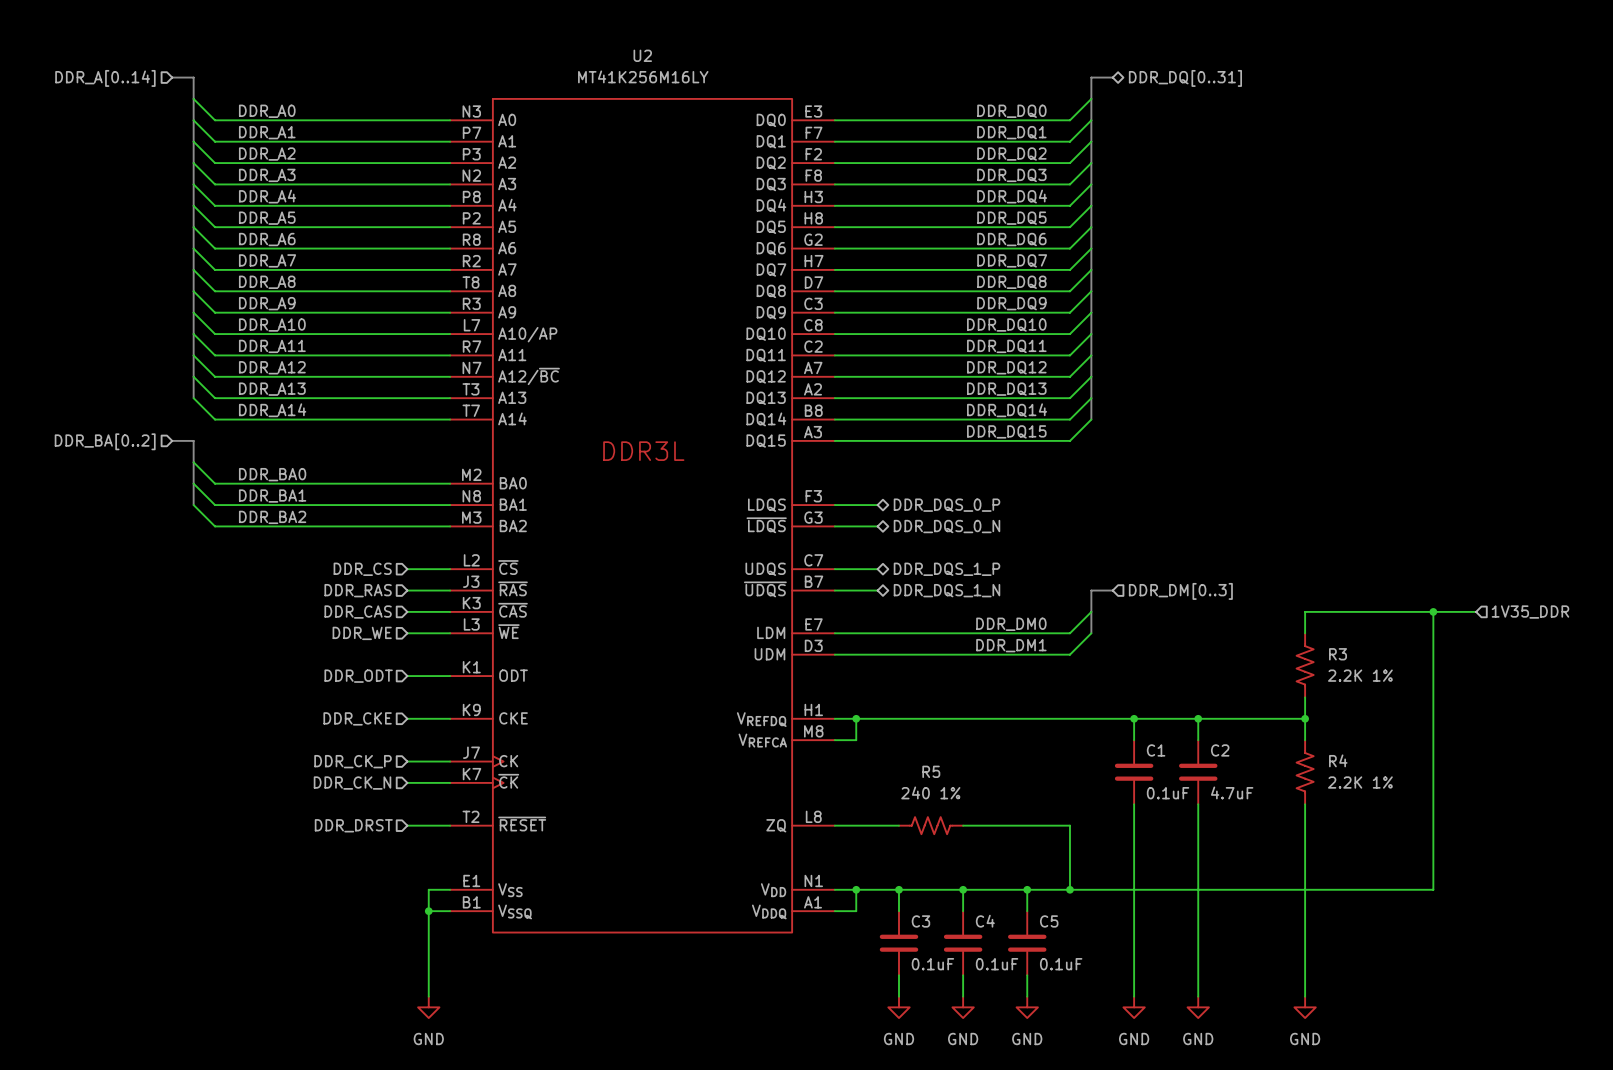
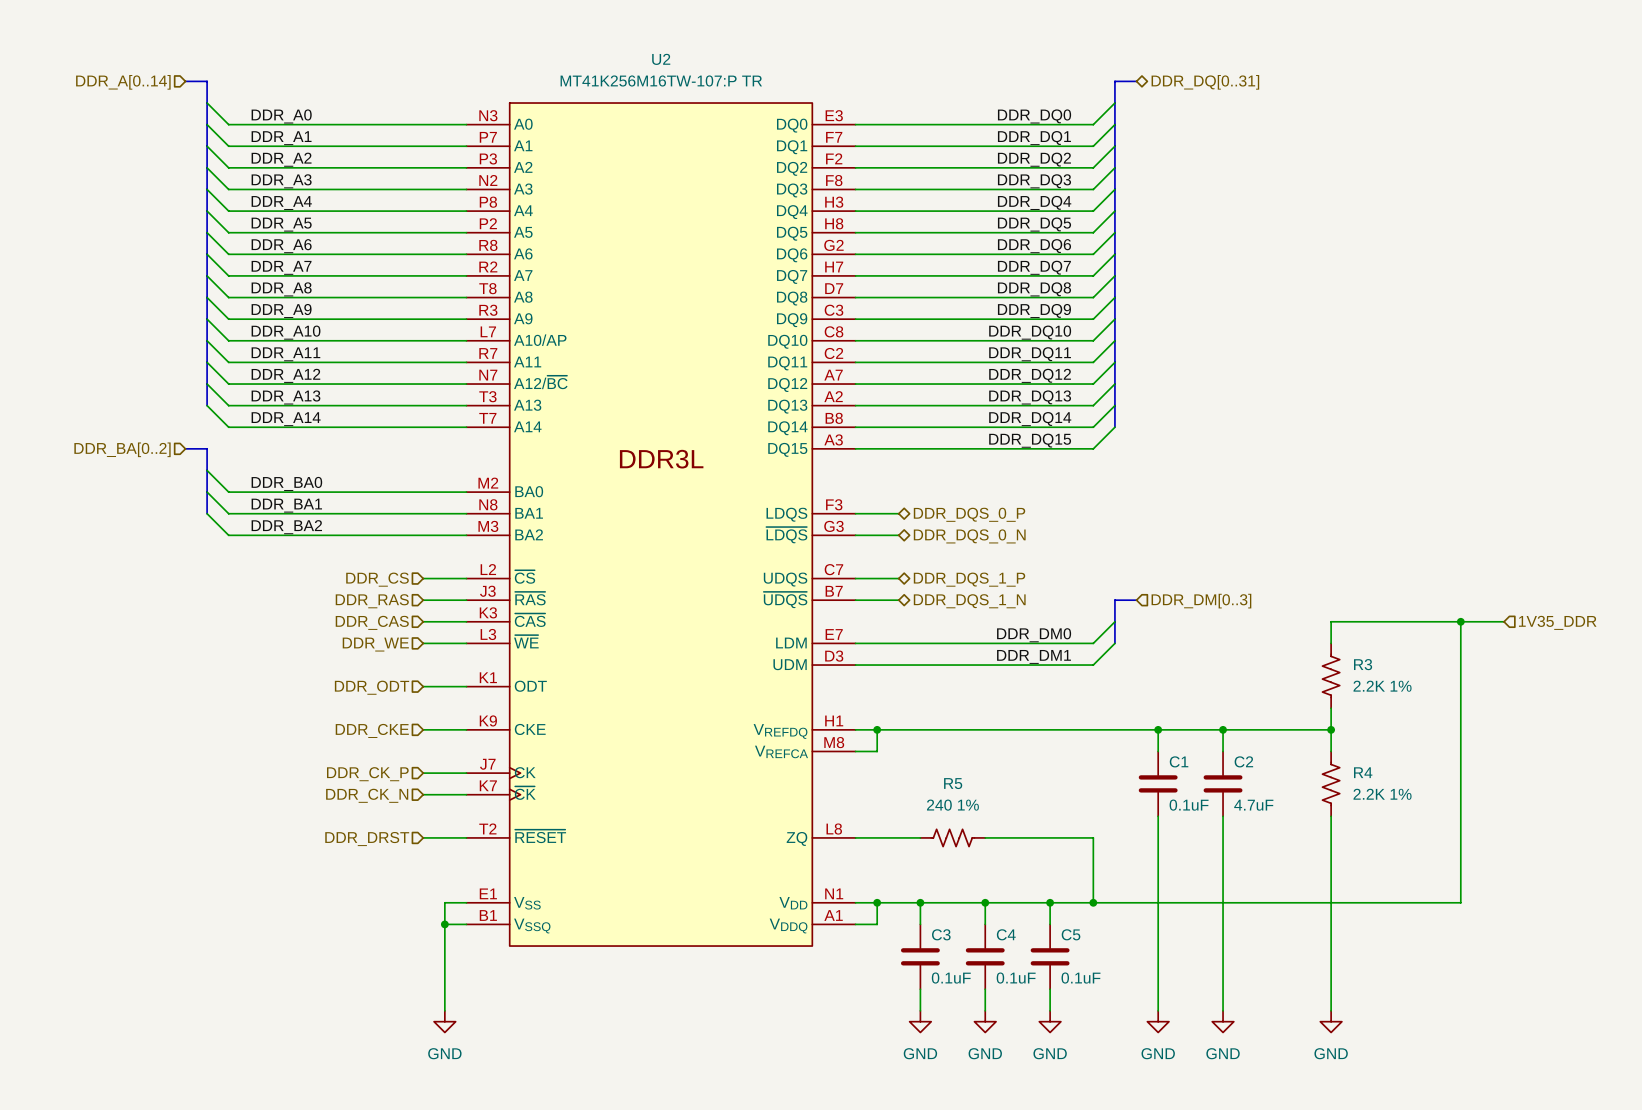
U2 value: MT41K256M16LY (643, 76) -> MT41K256M16TW-107:P TR (661, 80)

